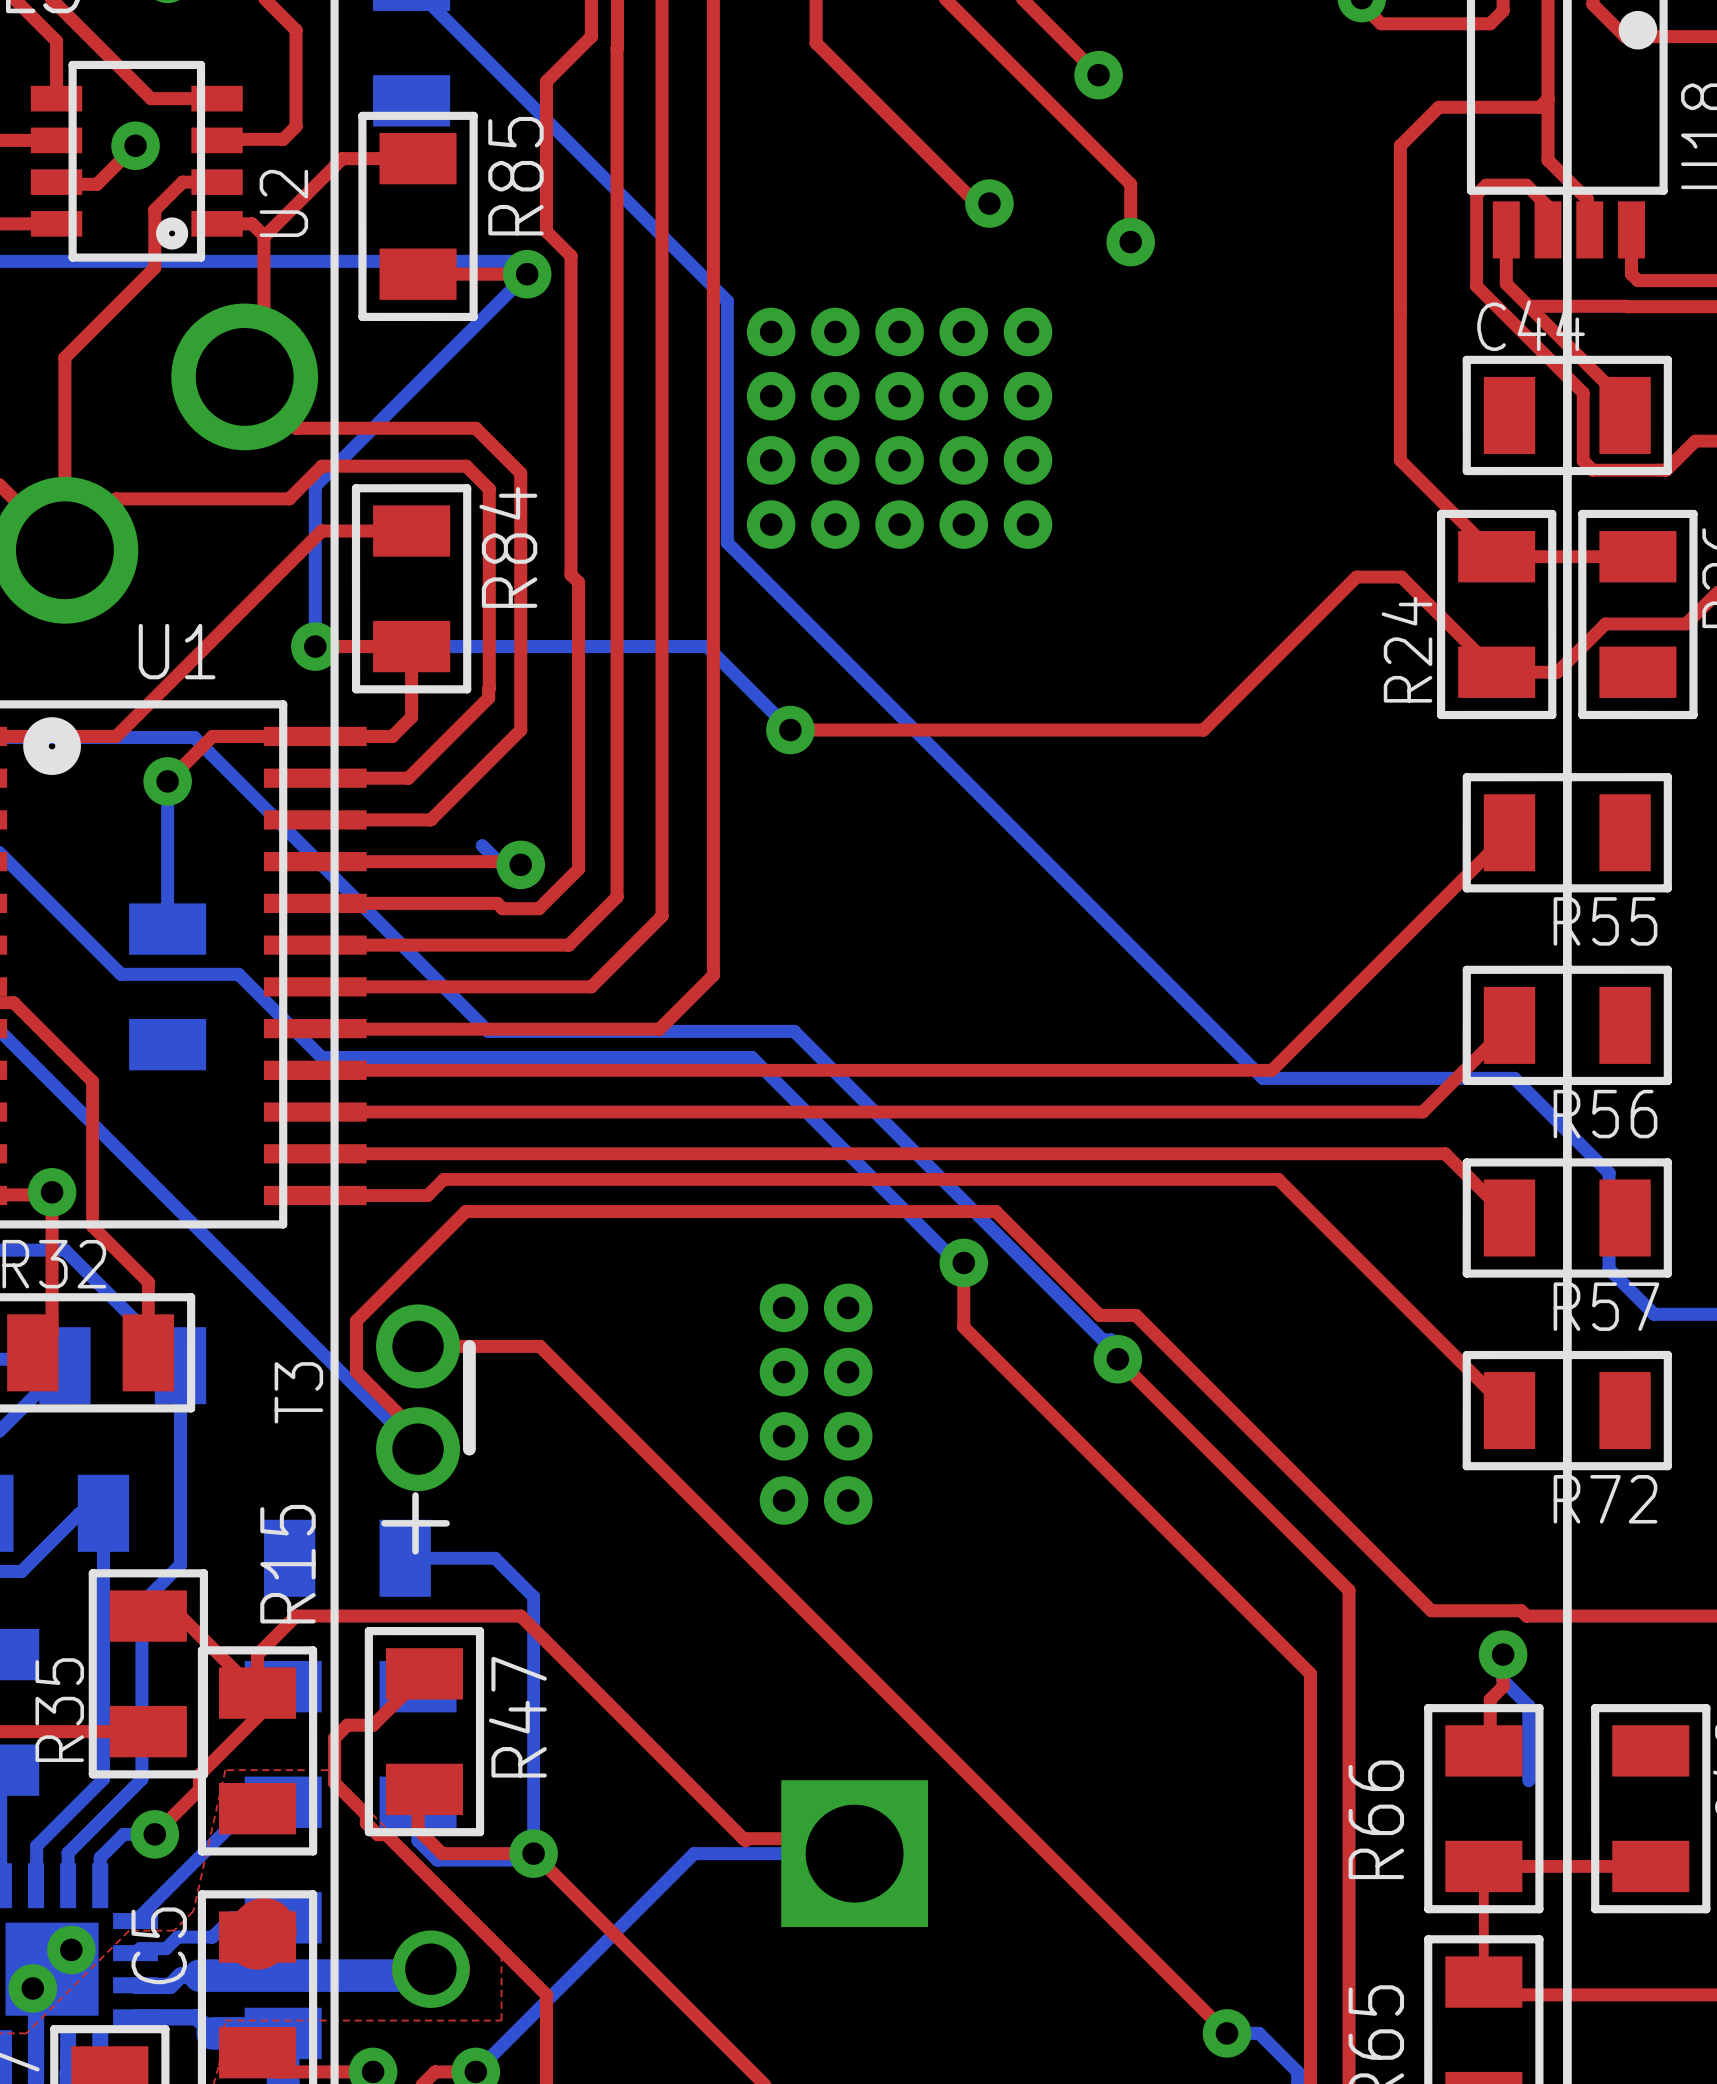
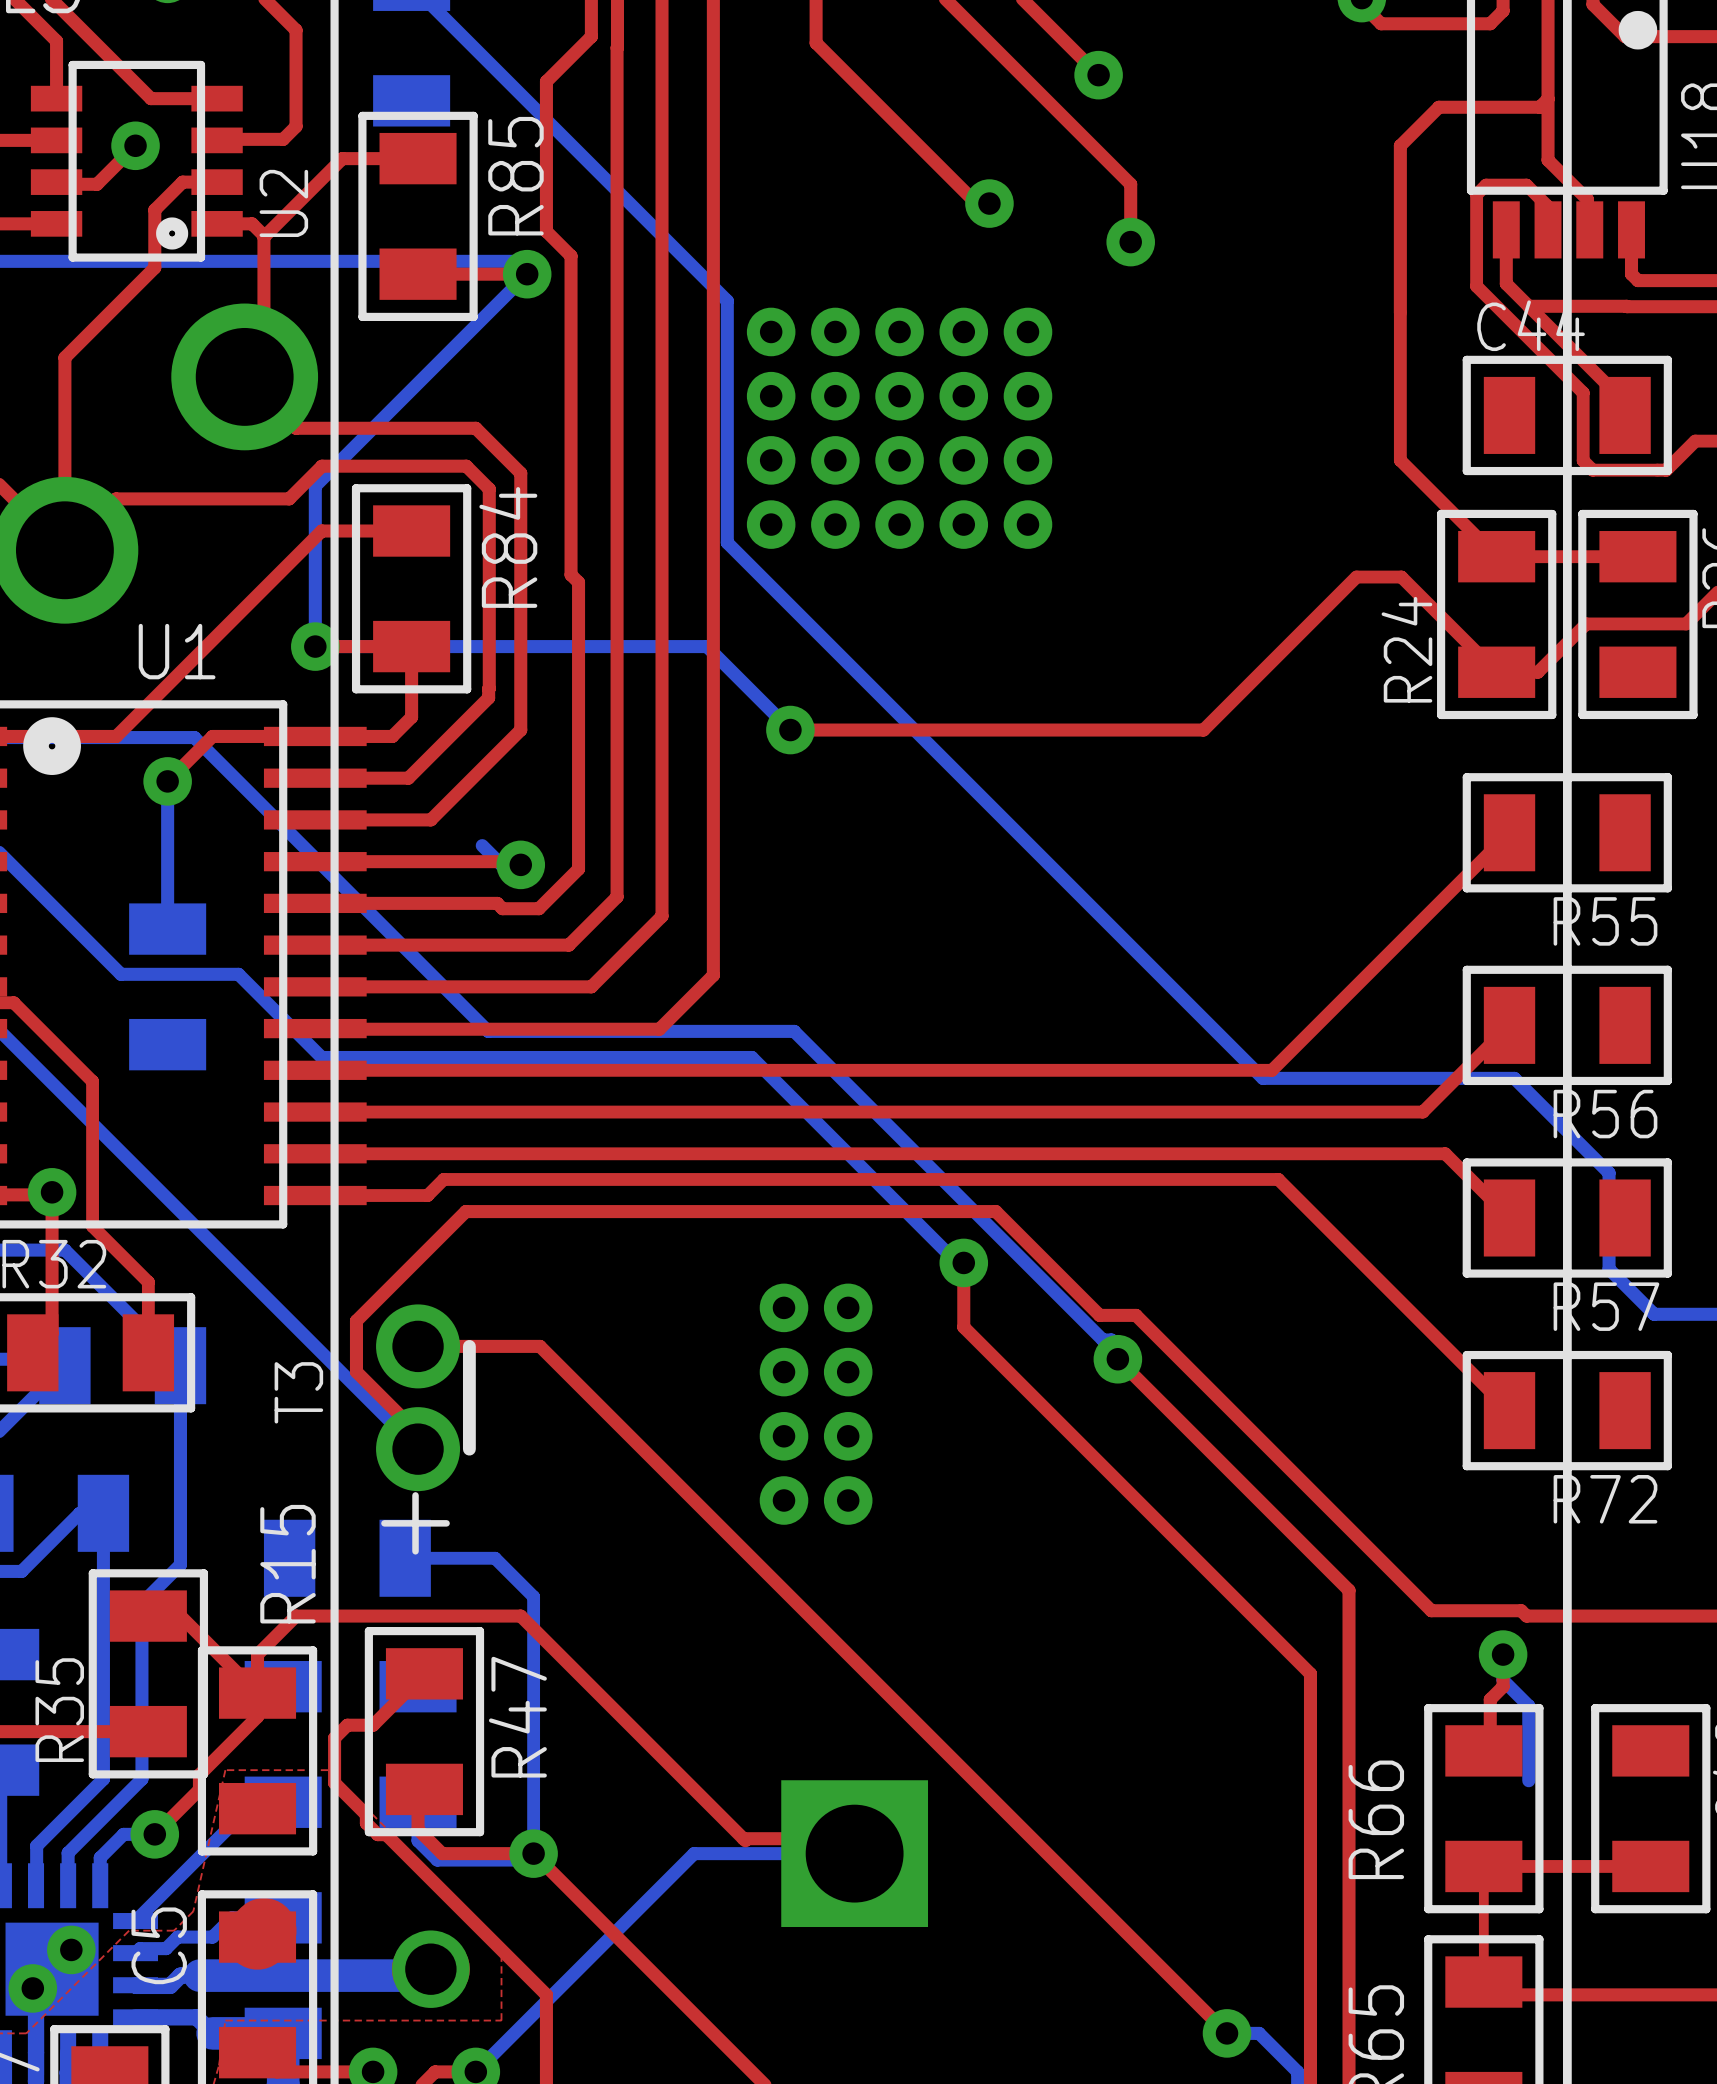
top track: (1605, 623) (1557, 672) (1537, 672) -> (1605, 623) (1586, 623) (1537, 672)

